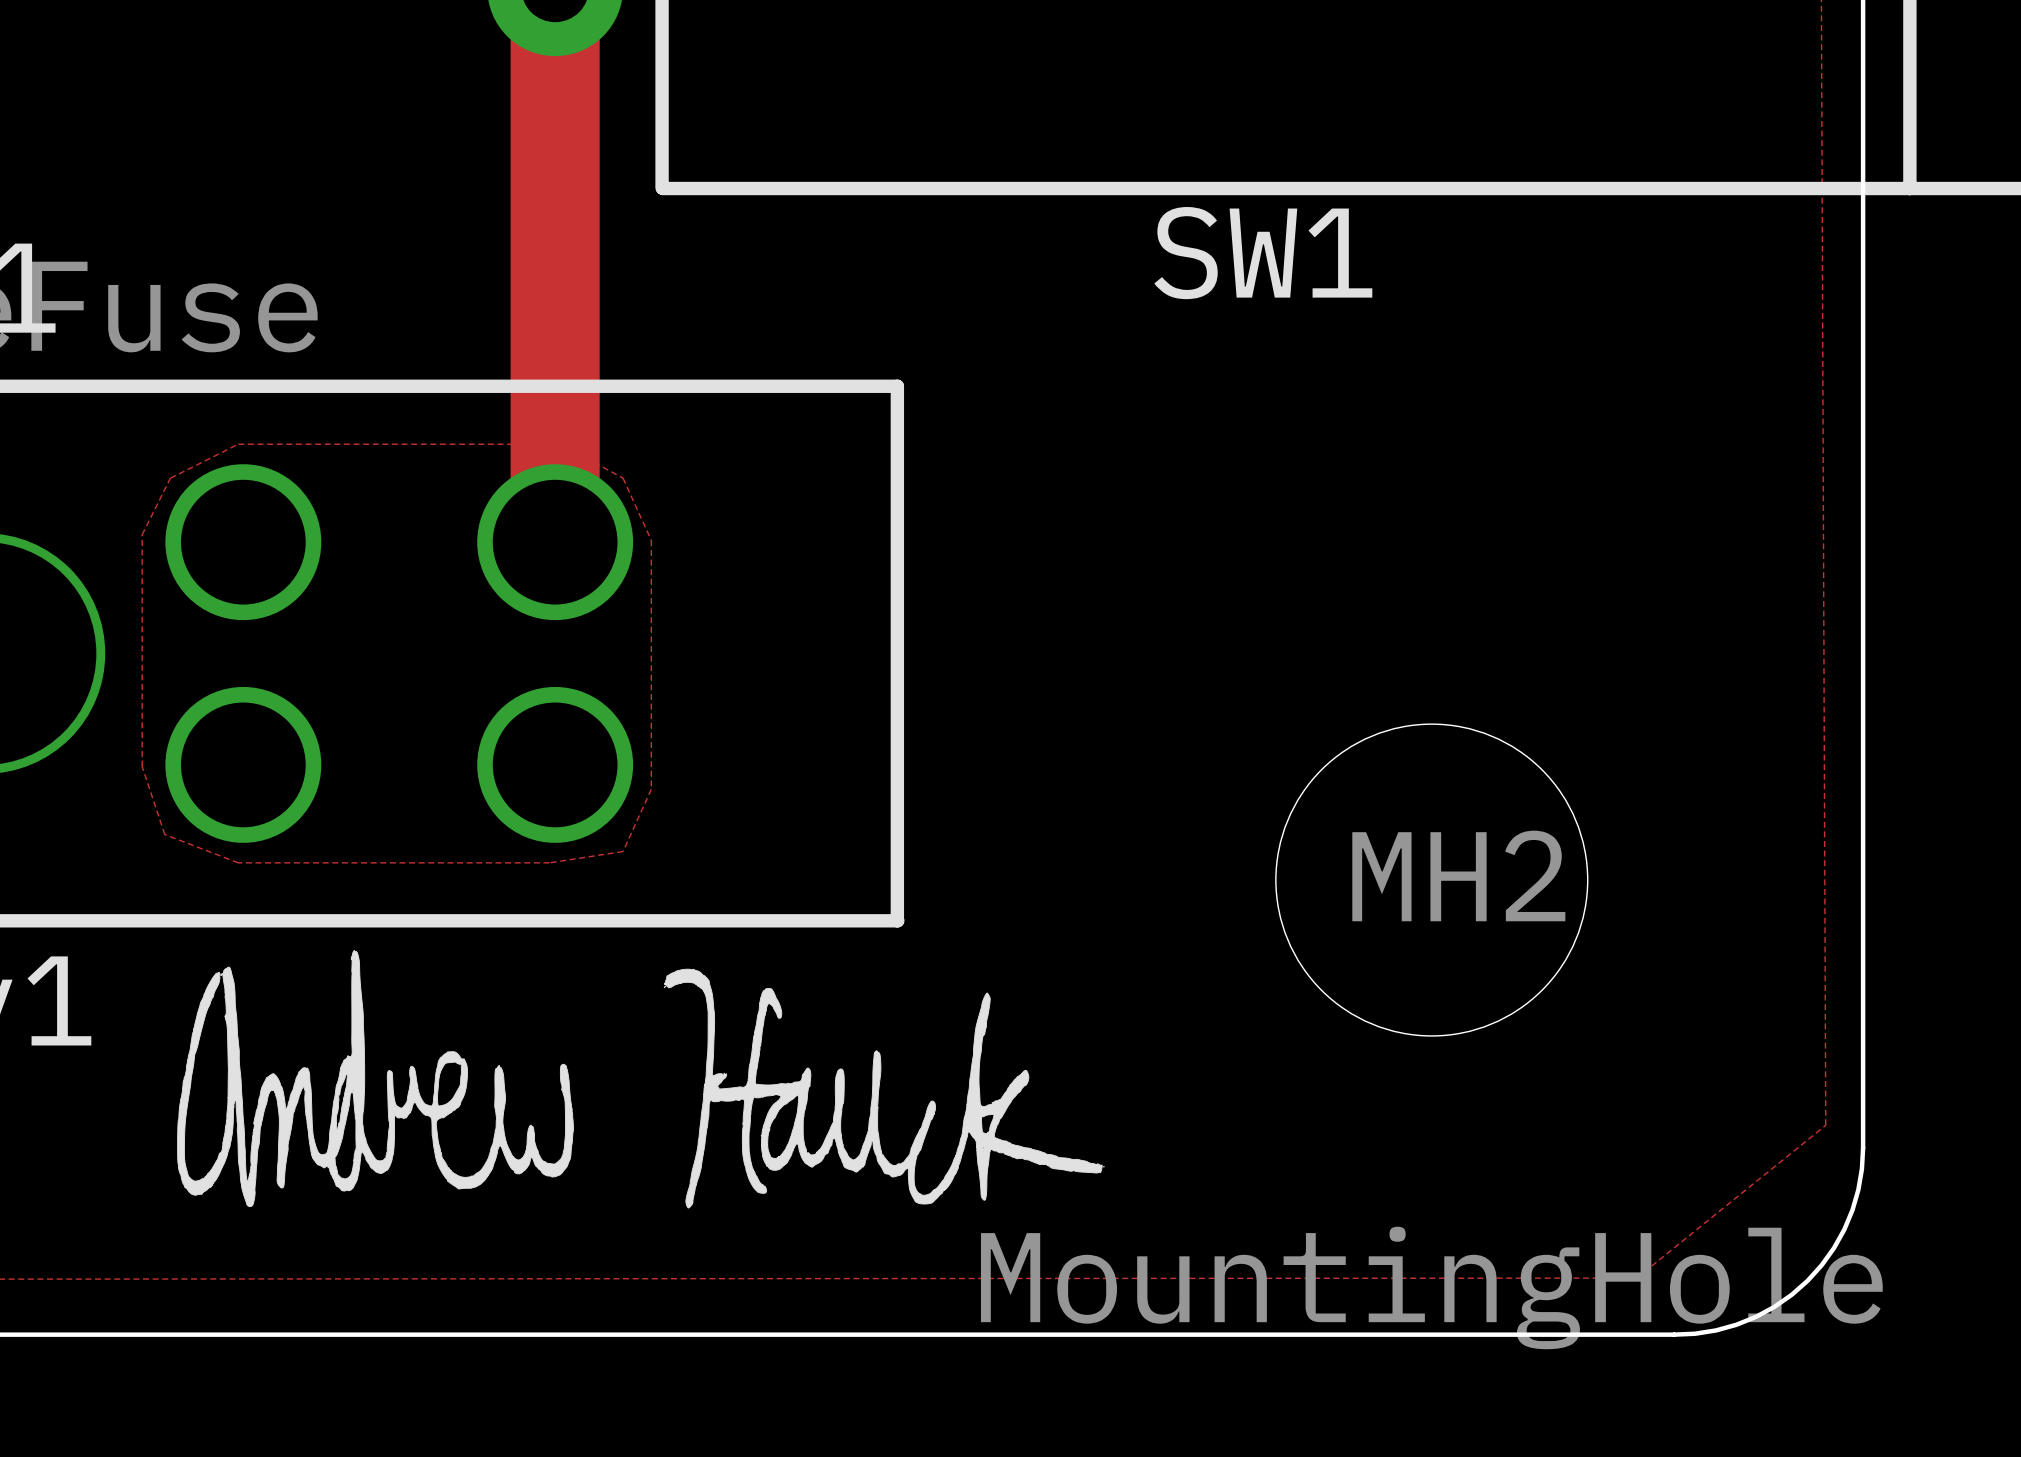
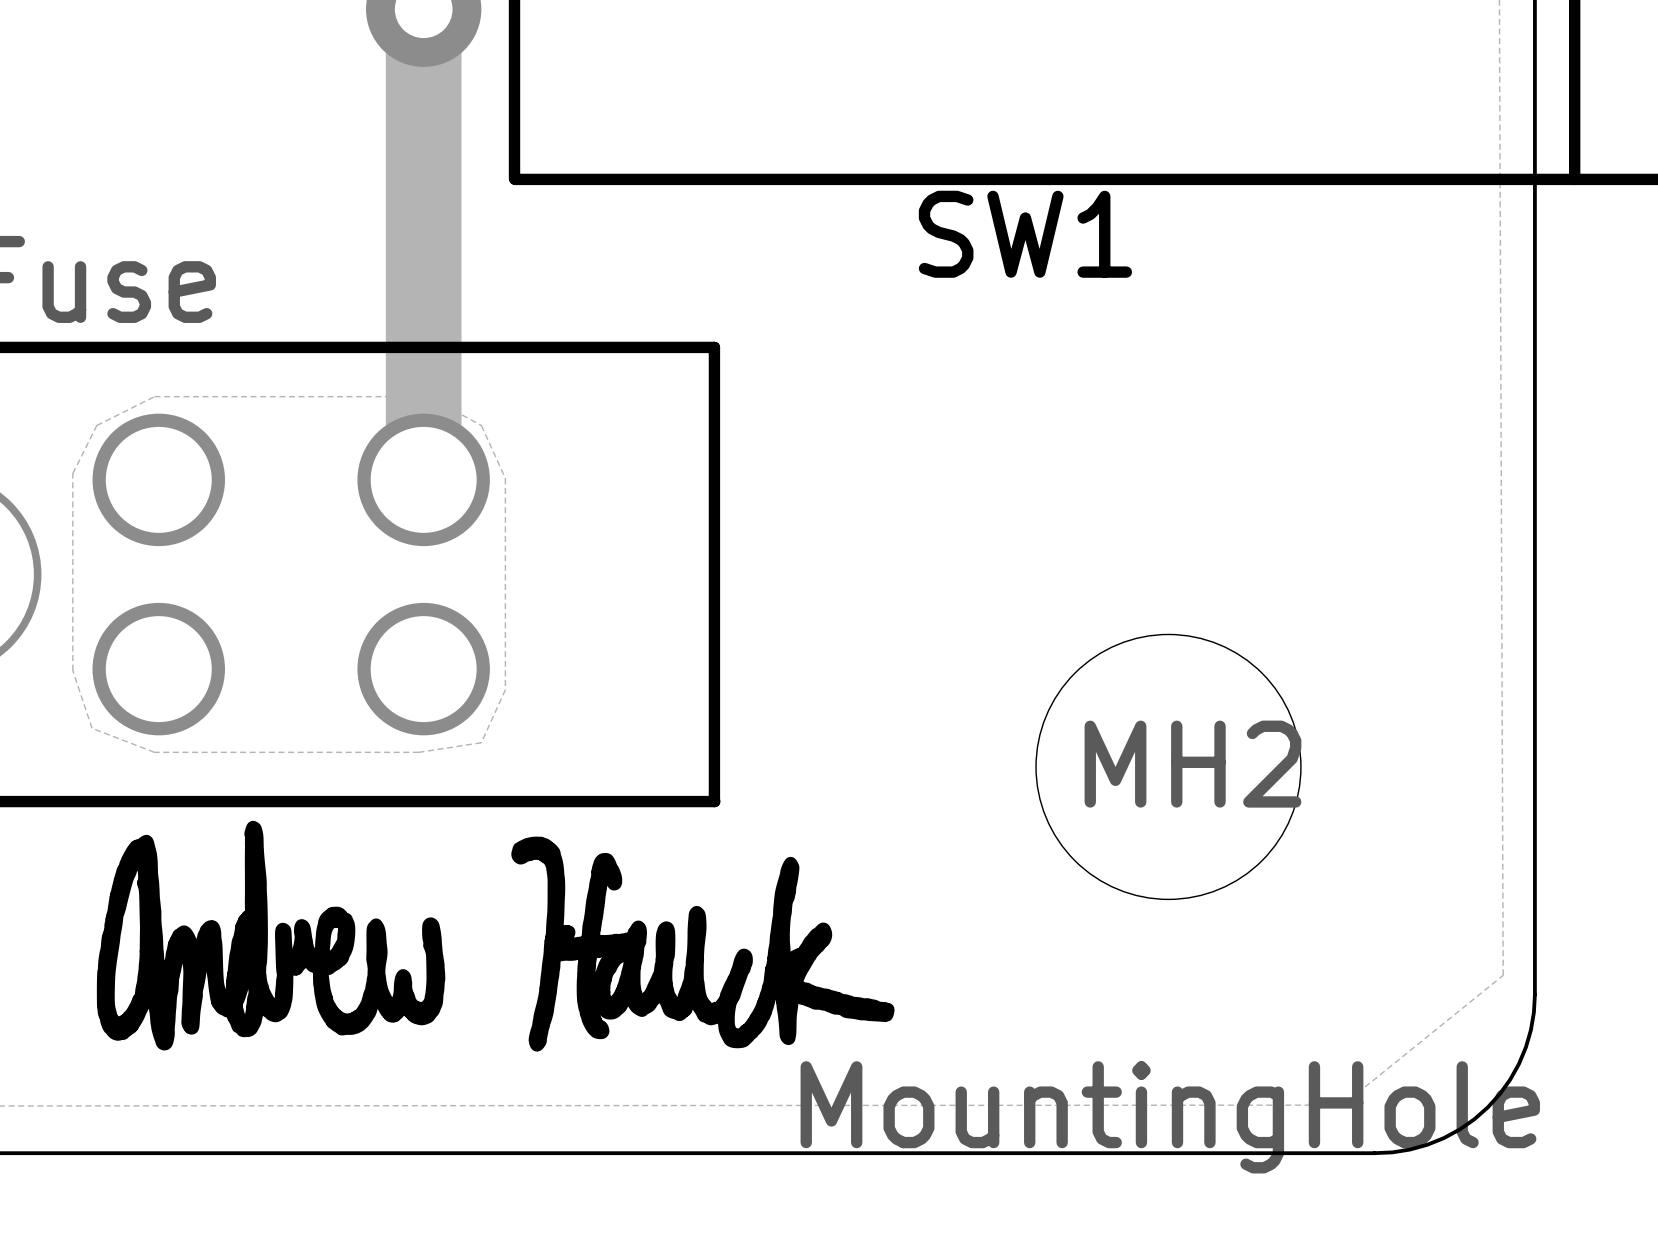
drawing shape: [177, 950, 1105, 1209] -> [96, 820, 895, 1052]

